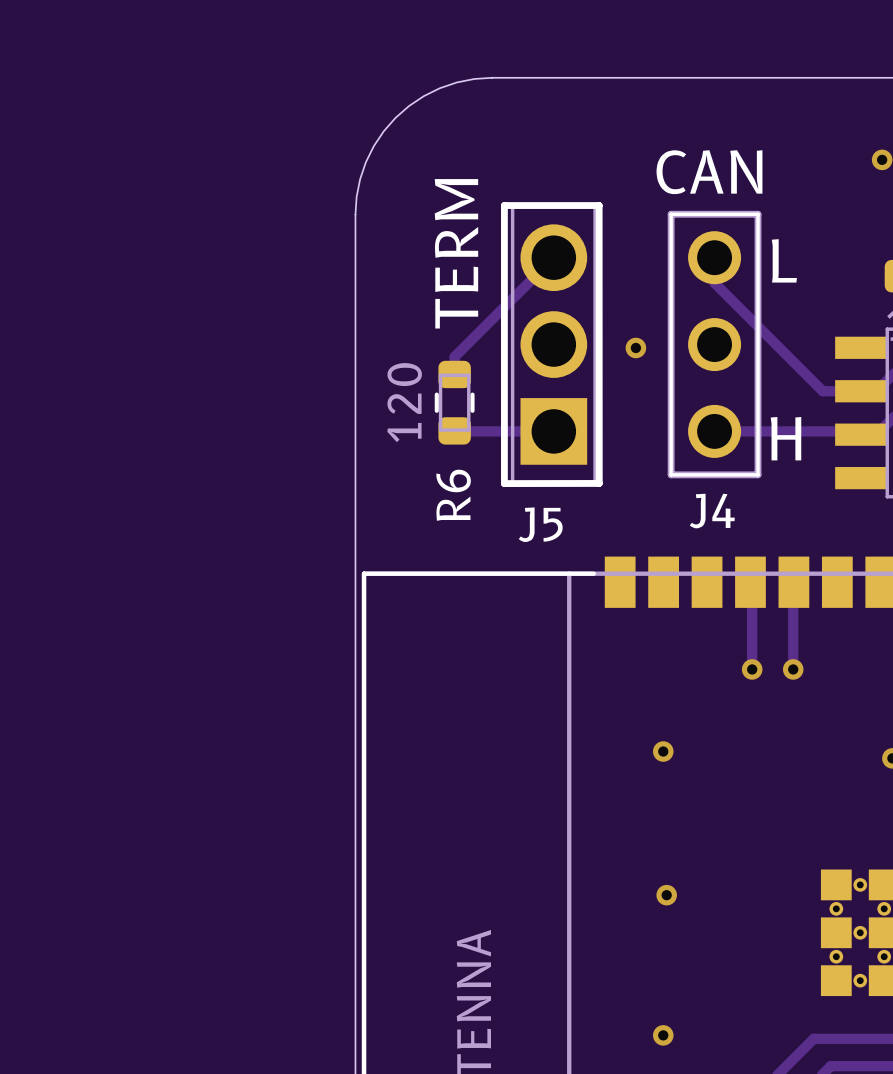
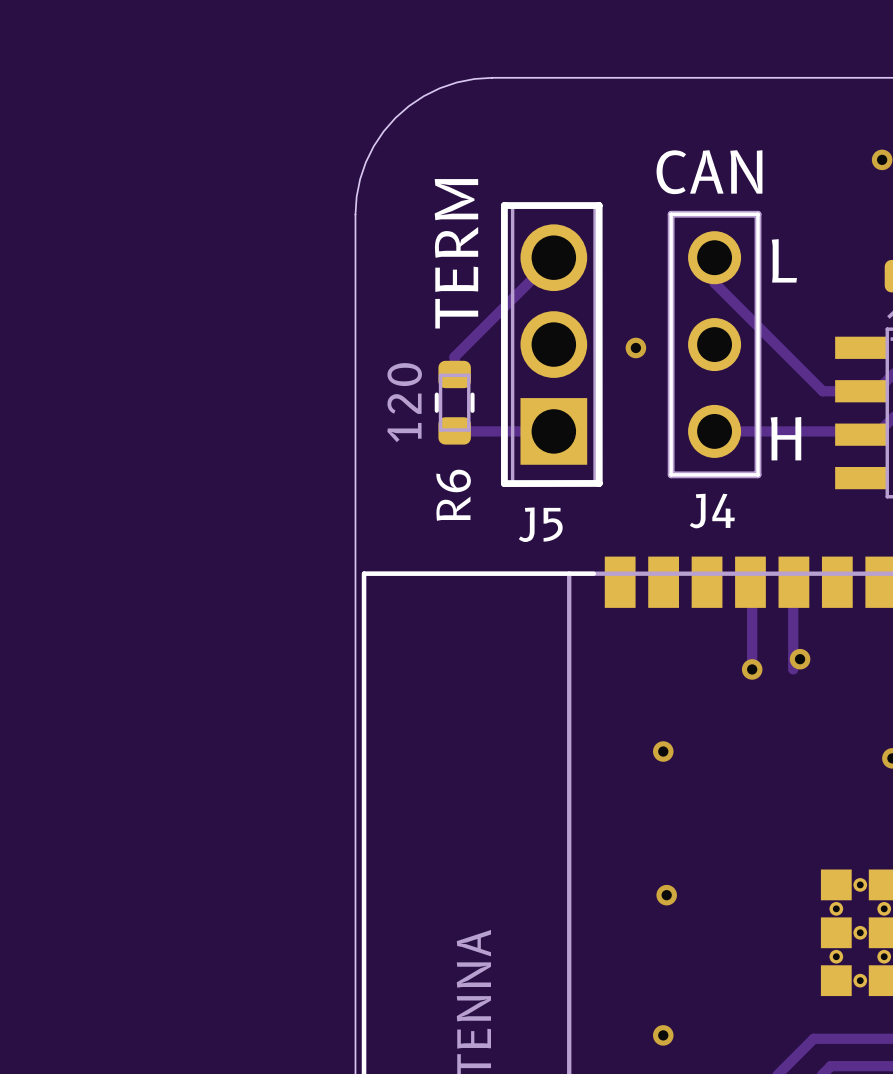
via position: (793, 669) -> (800, 659)

